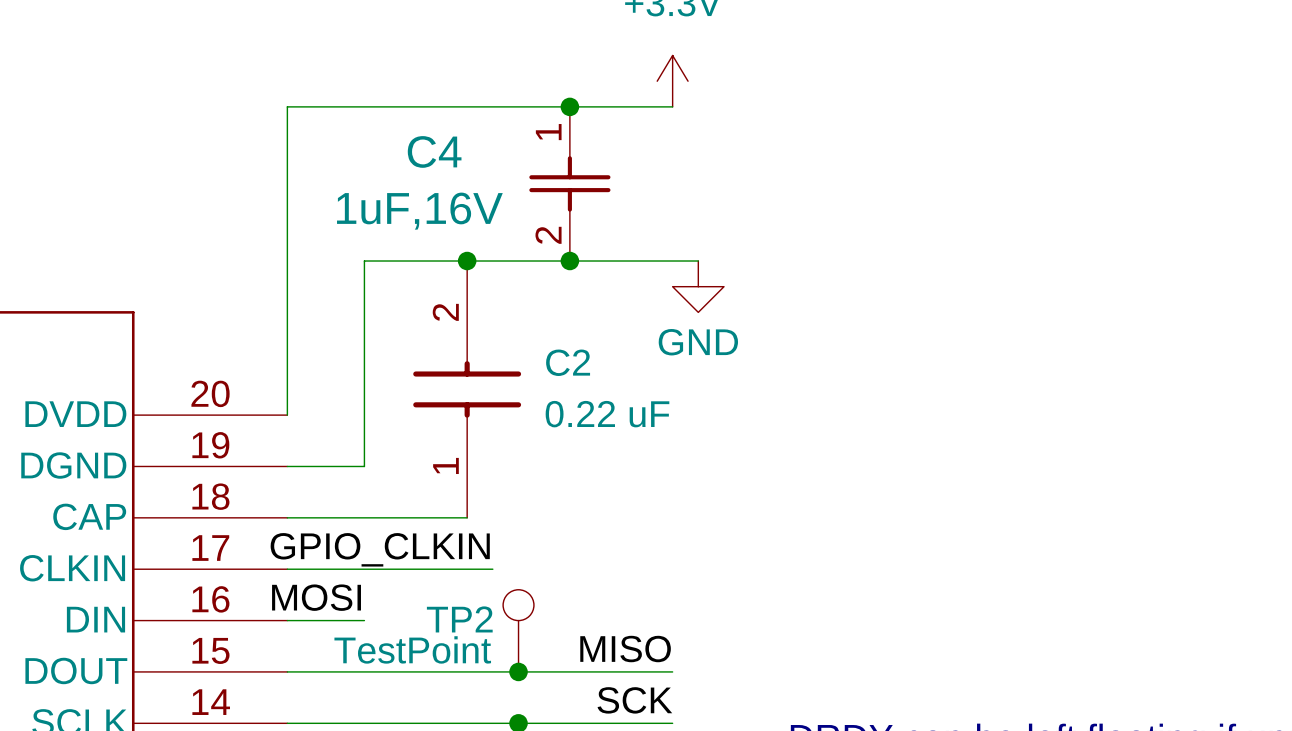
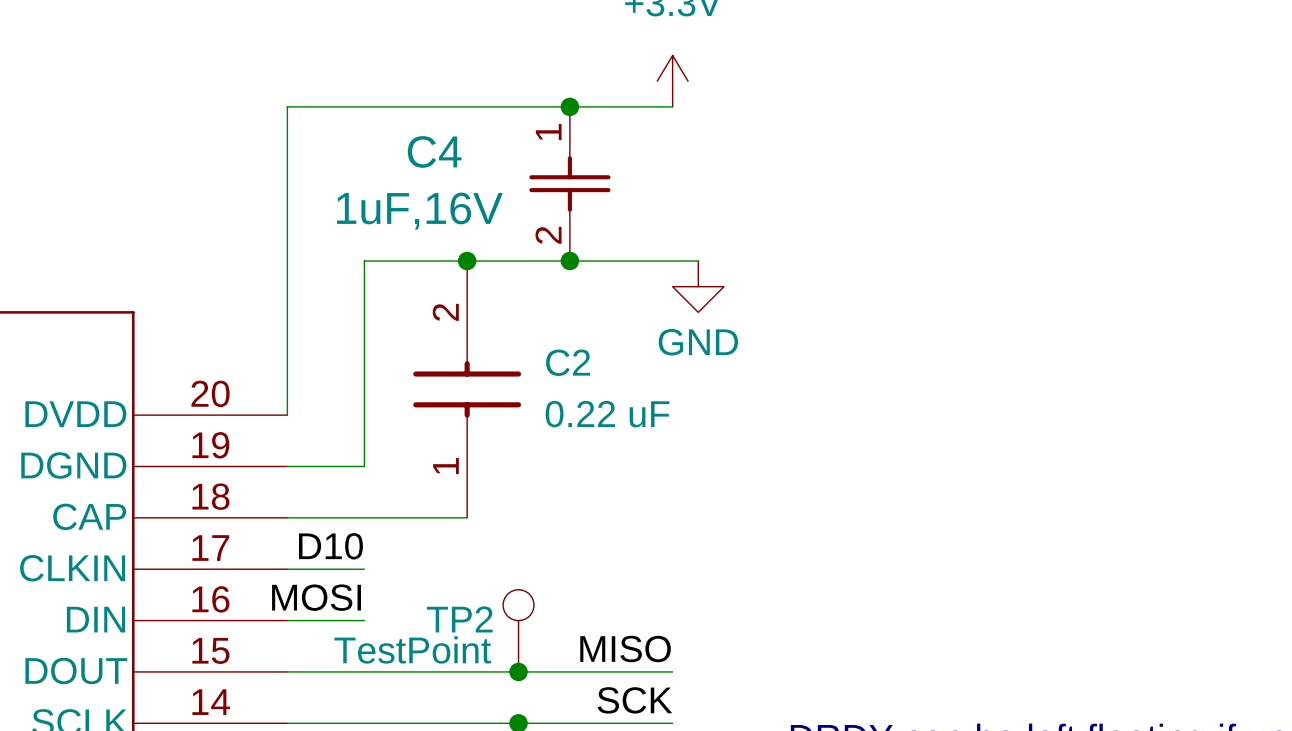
label: none -> D10 (330, 546)
label: GPIO_CLKIN (380, 549) -> none
wire: (364, 569) (492, 569) -> none

